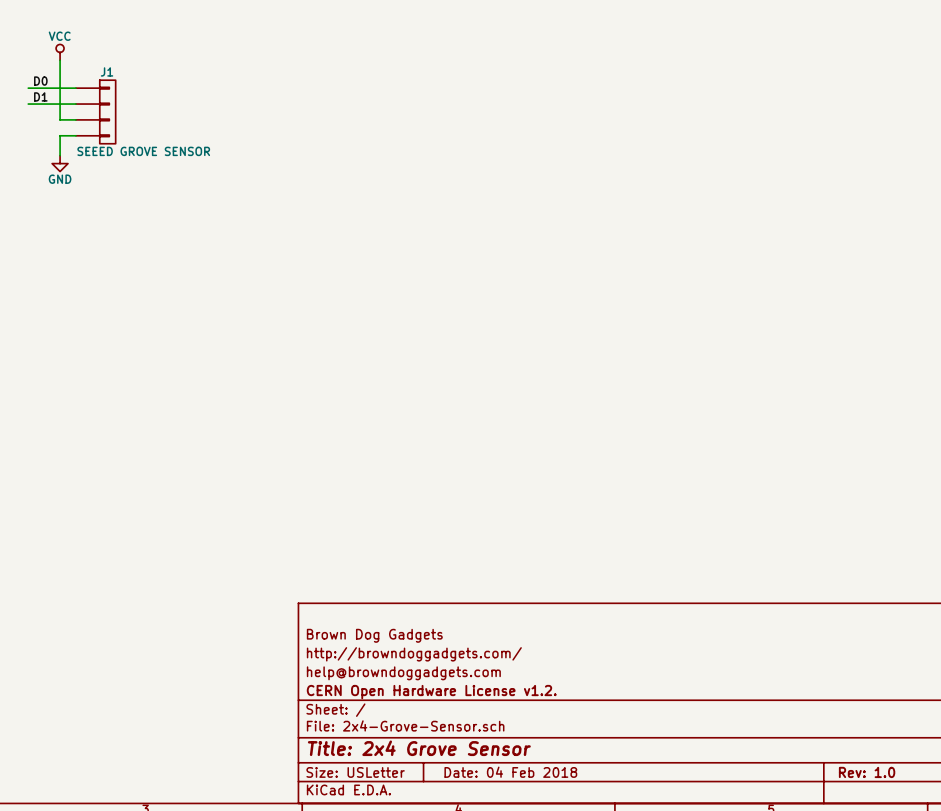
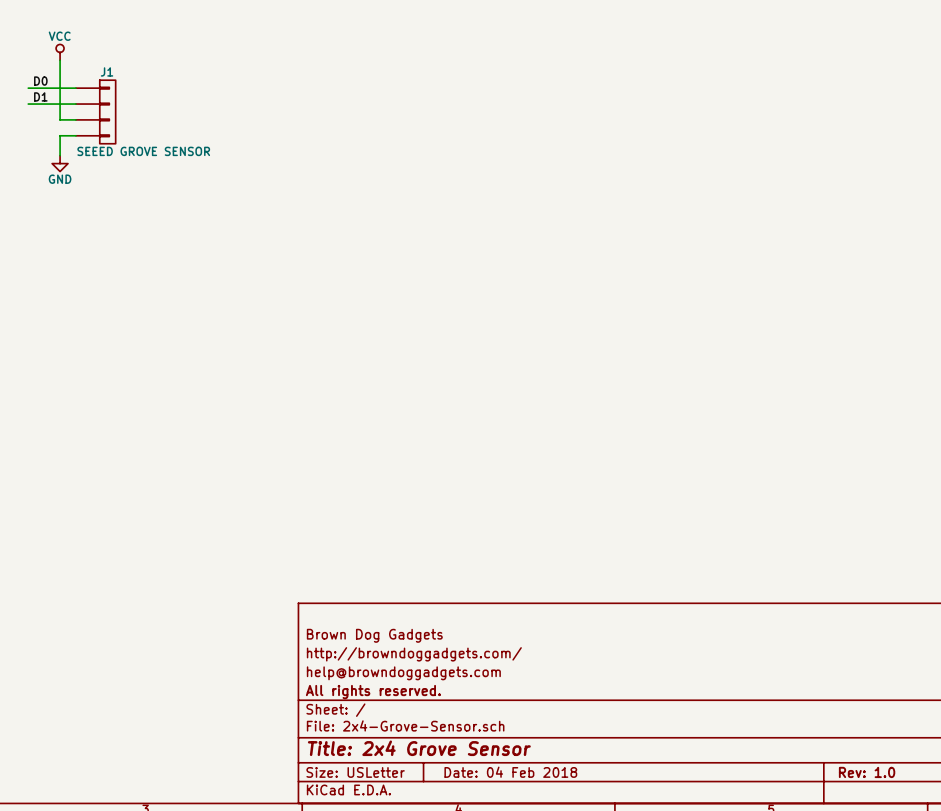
title block: CERN Open Hardware License v1.2. (431, 692) -> All rights reserved. (373, 692)

